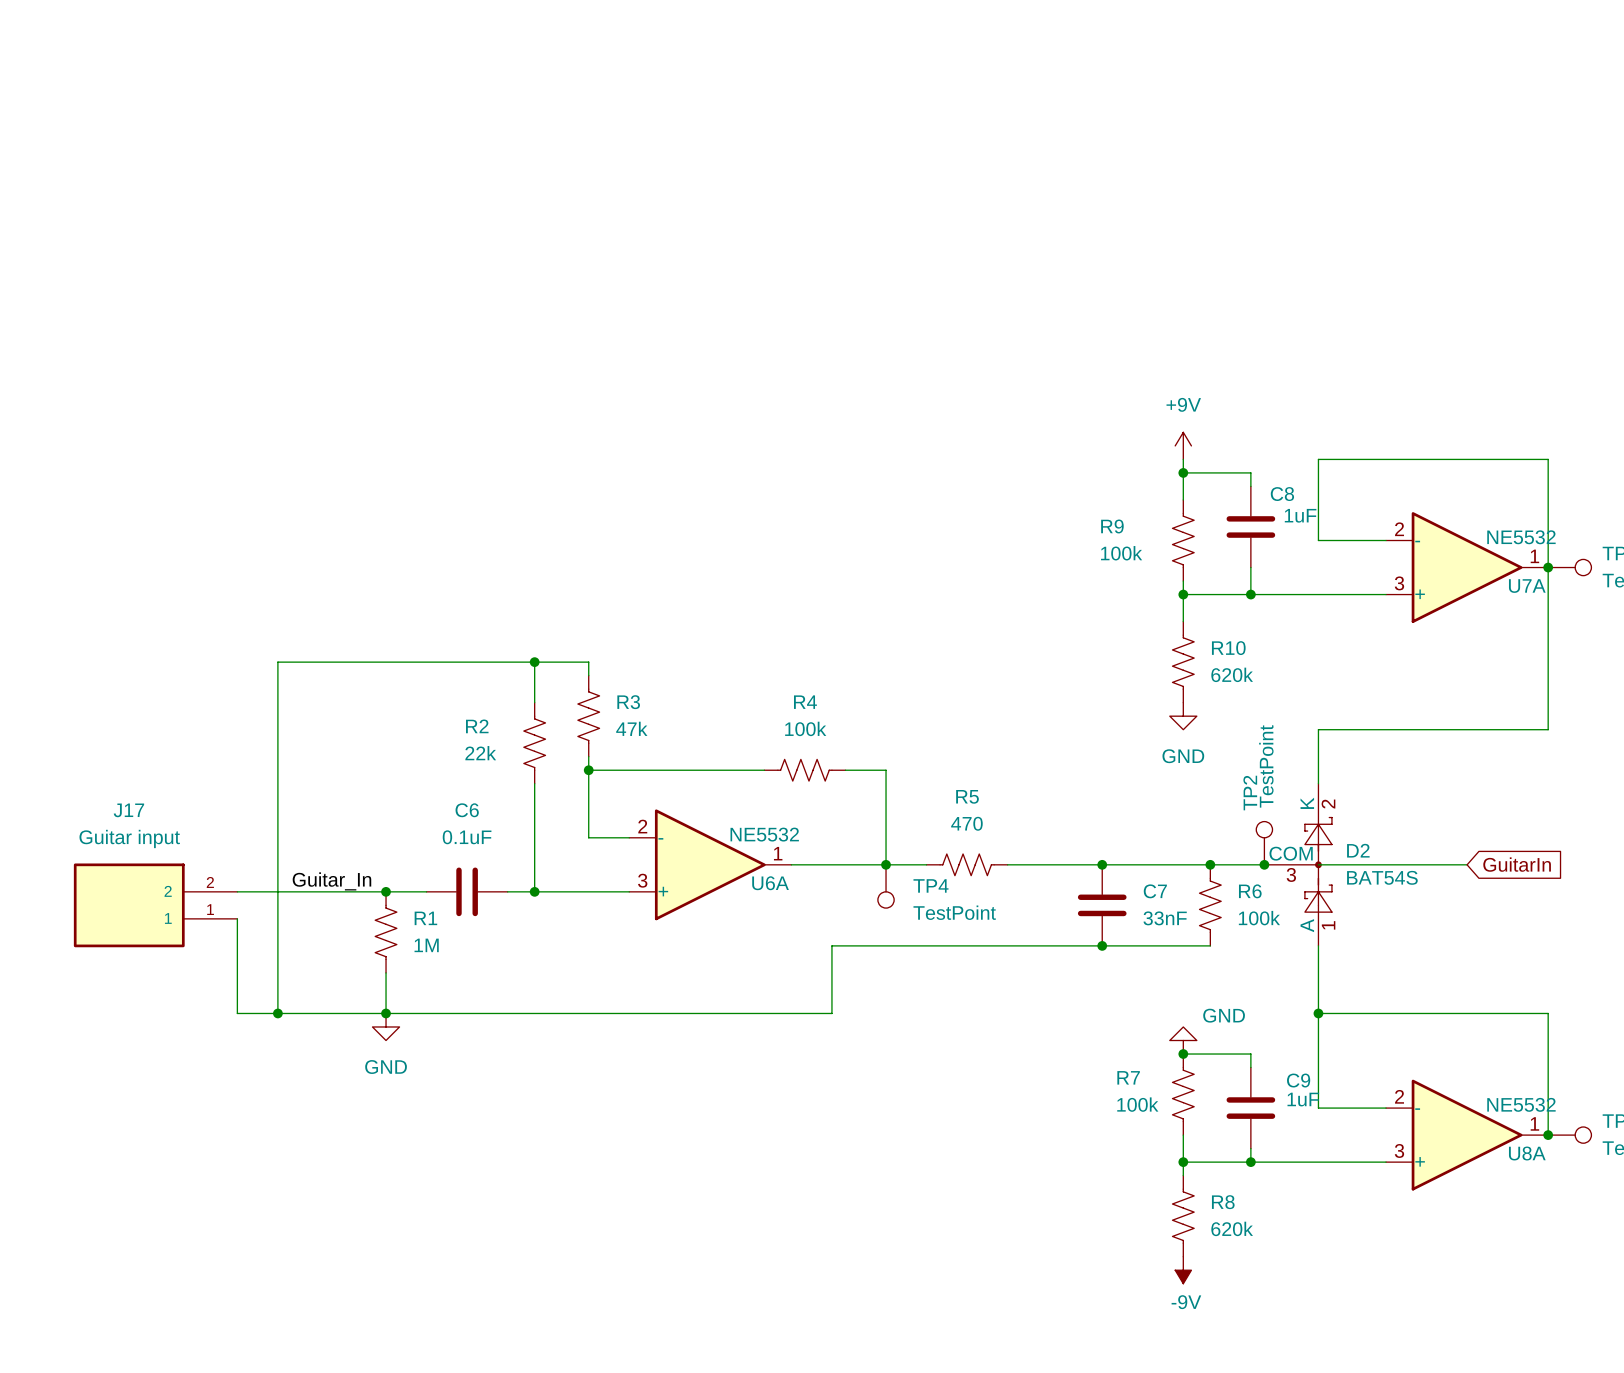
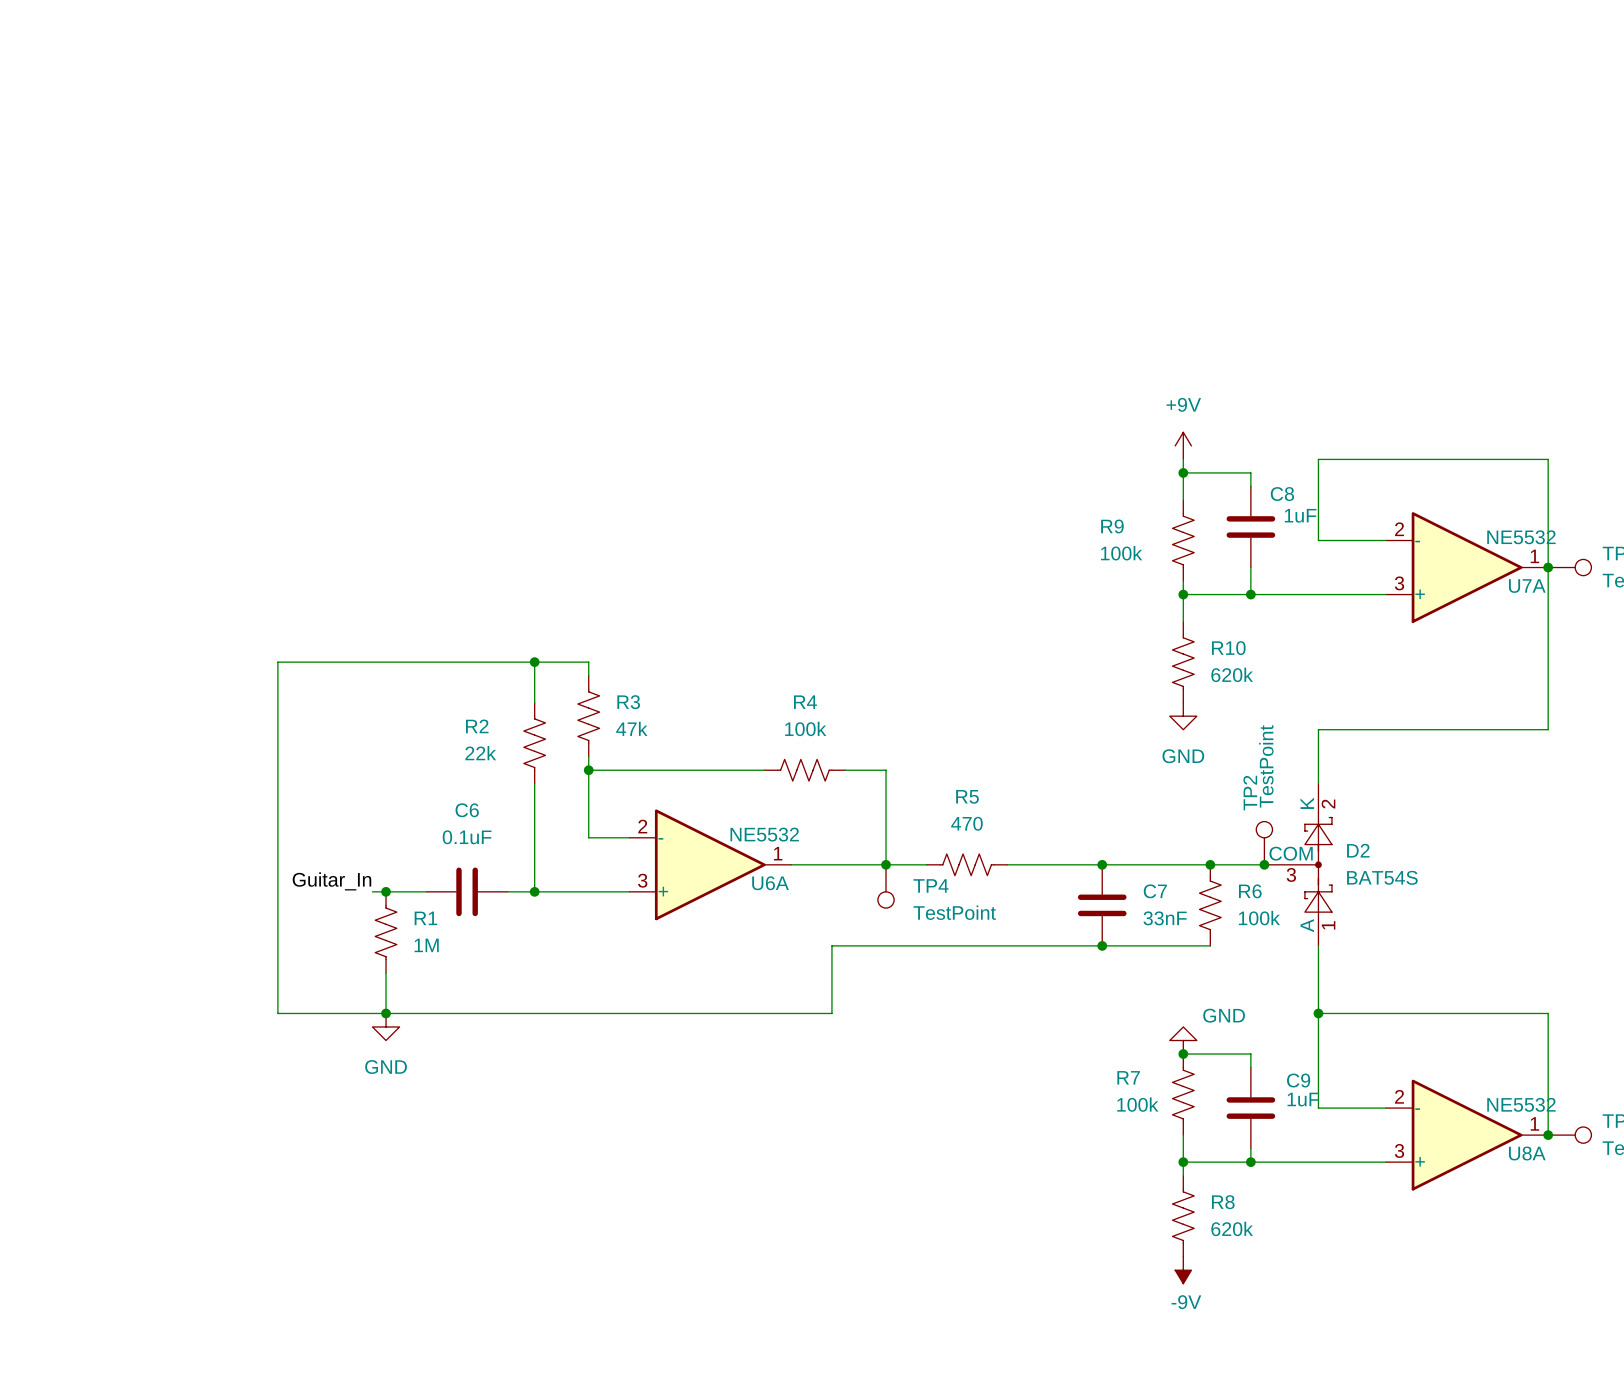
wire: (1318, 864) (1467, 864) -> none
global label: GuitarIn (1517, 864) -> none
wire: (237, 891) (372, 891) -> none
J17: Guitar input (155, 905) -> none
wire: (237, 918) (237, 1013) (277, 1013) -> none
junction: (277, 1013) -> none

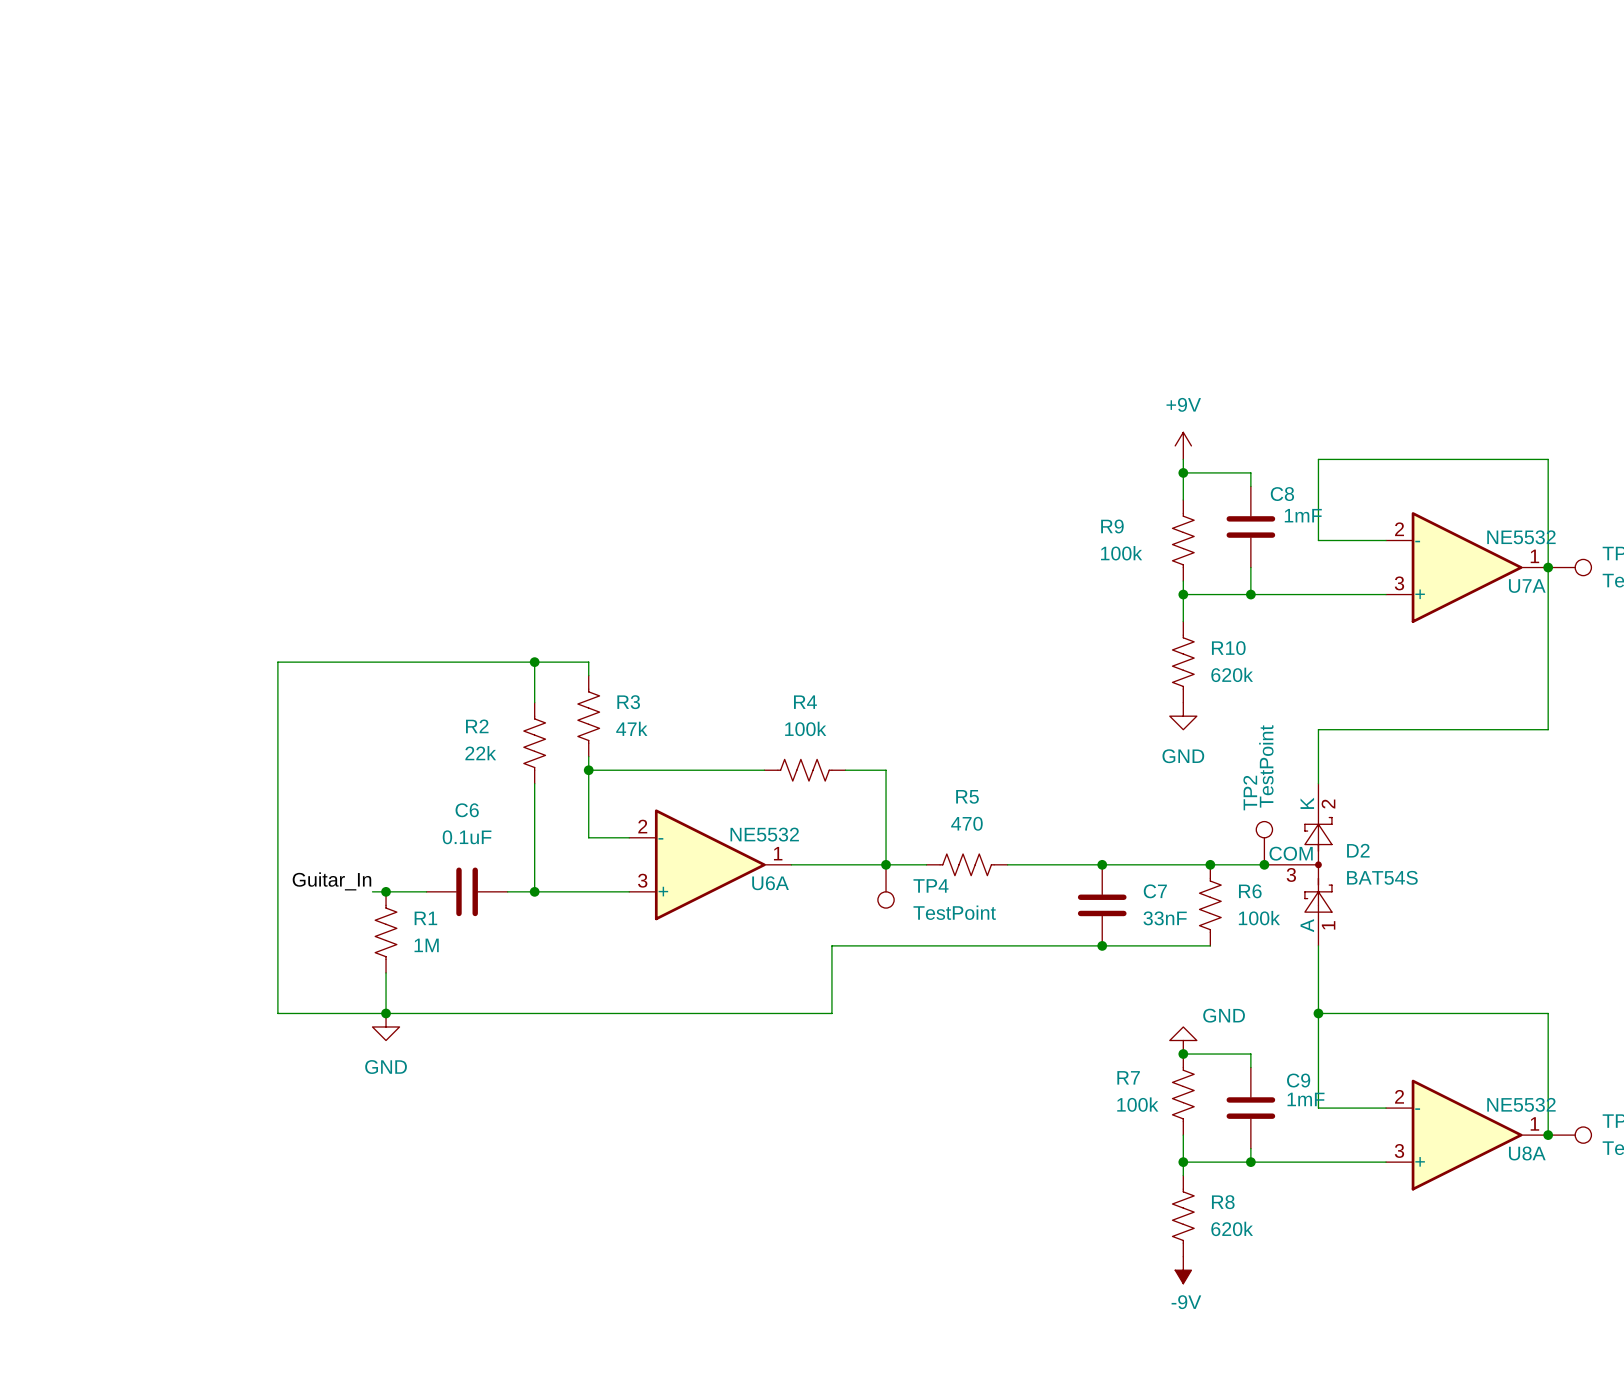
C8 value: 1uF (1300, 515) -> 1mF (1303, 515)
C9 value: 1uF (1303, 1099) -> 1mF (1306, 1099)

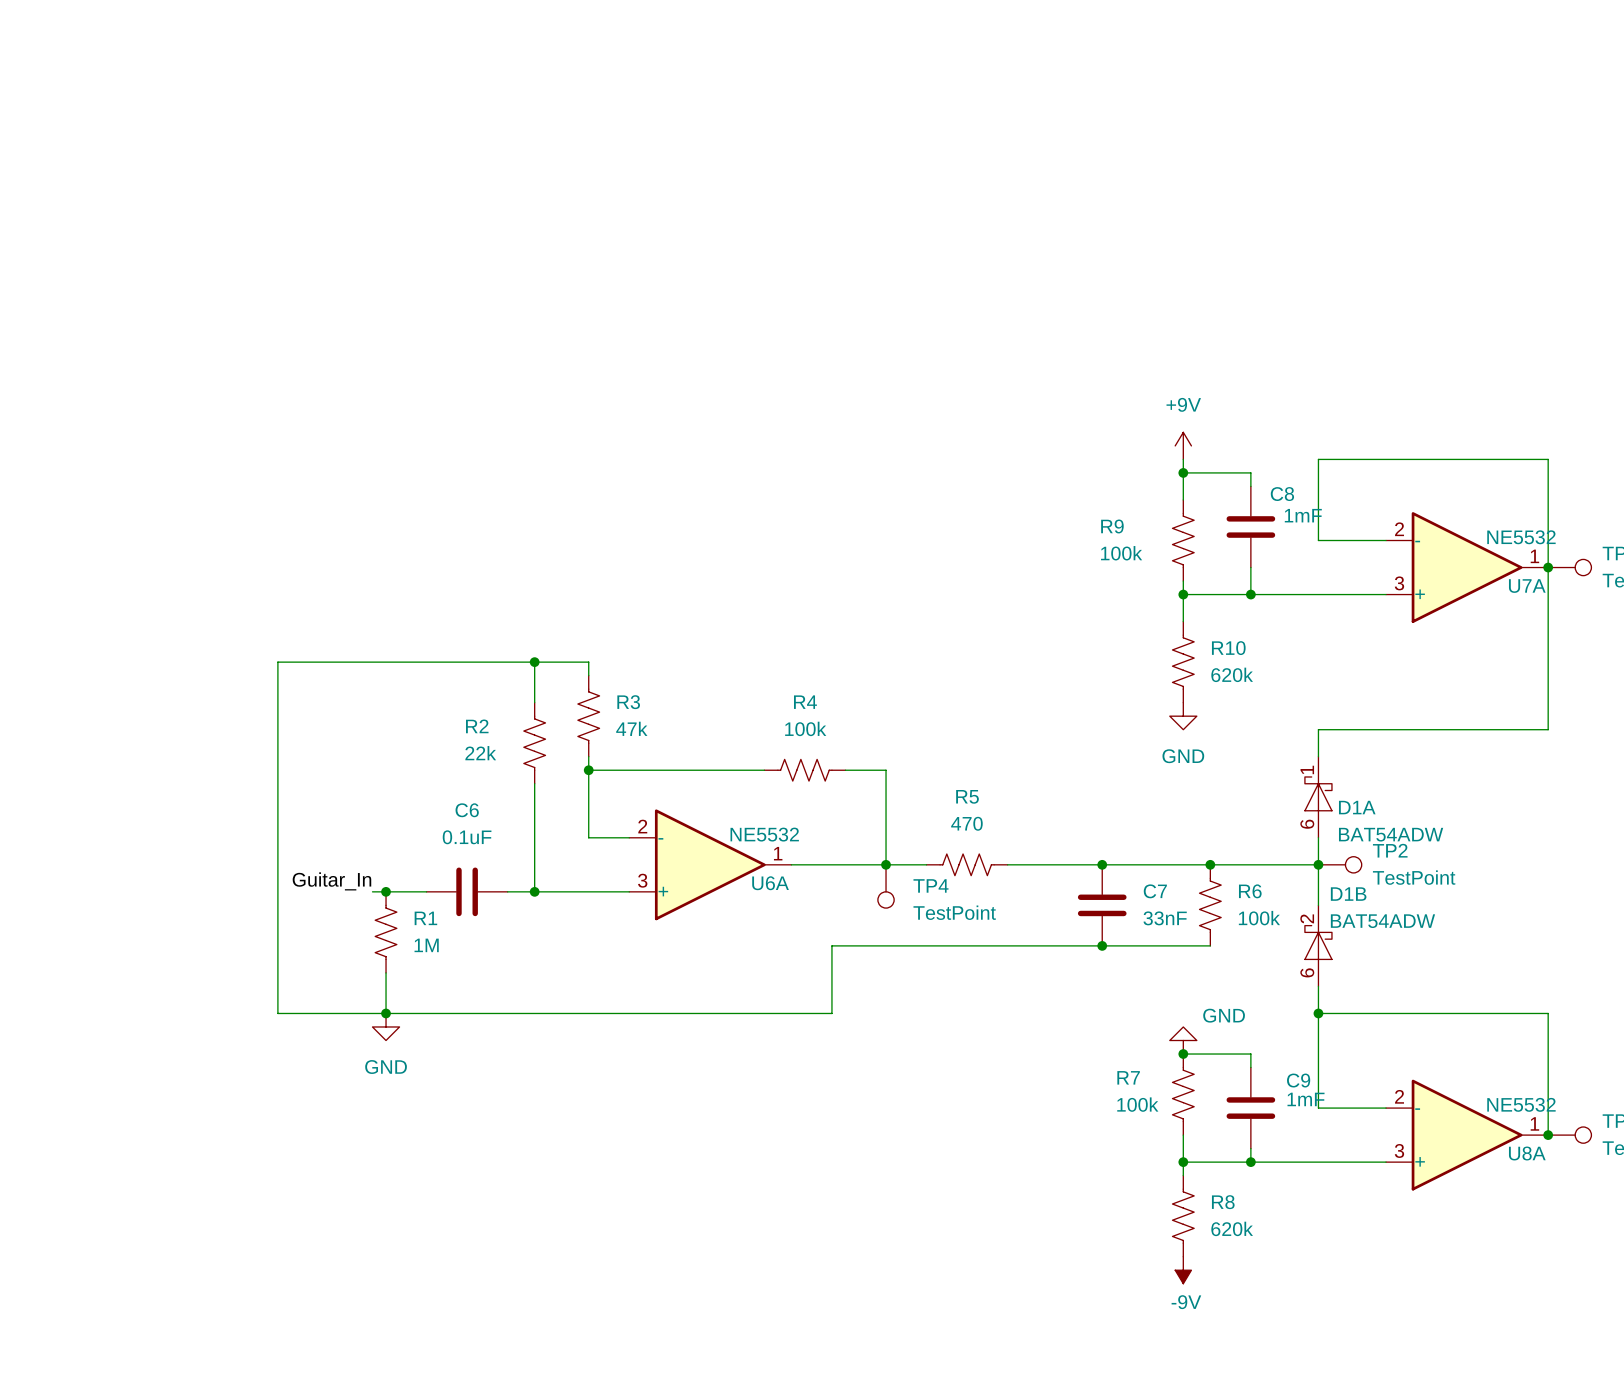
D1A: none -> BAT54ADW (1318, 797)
TP2 rotation: 0° (1264, 829) -> 90° clockwise (1353, 864)
TP2 position: (1264, 843) -> (1340, 864)
junction position: (1264, 864) -> (1318, 864)
D2: BAT54S (1298, 864) -> none
D1B: none -> BAT54ADW (1318, 945)

